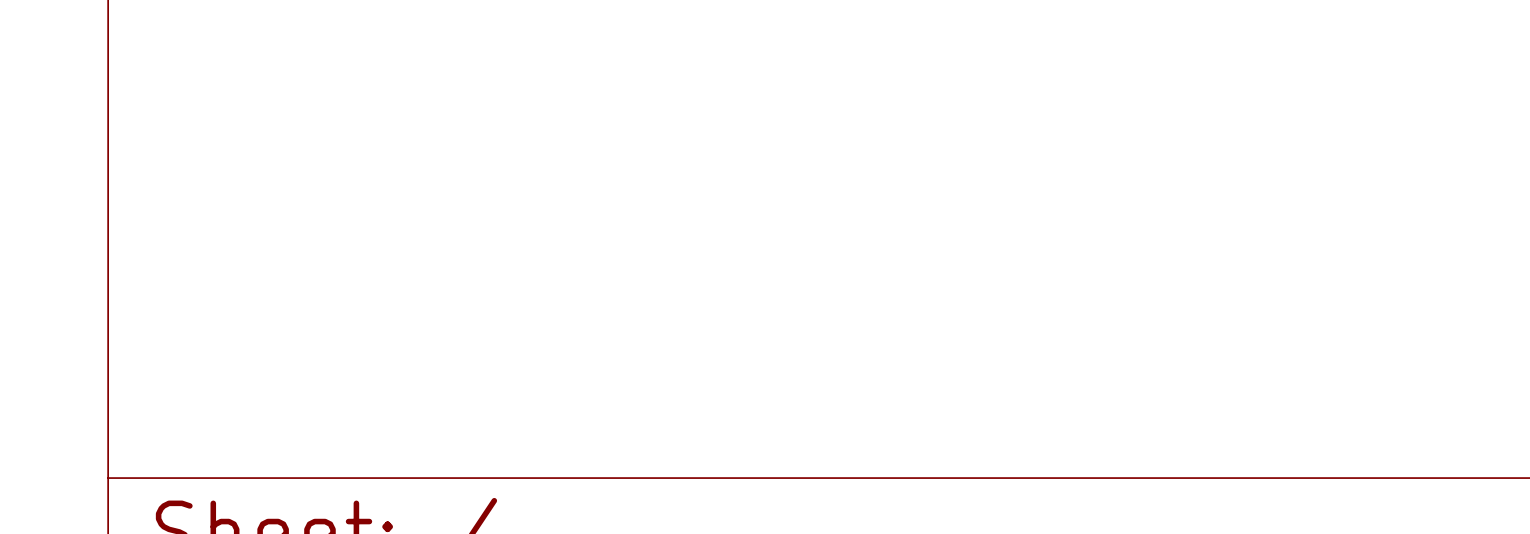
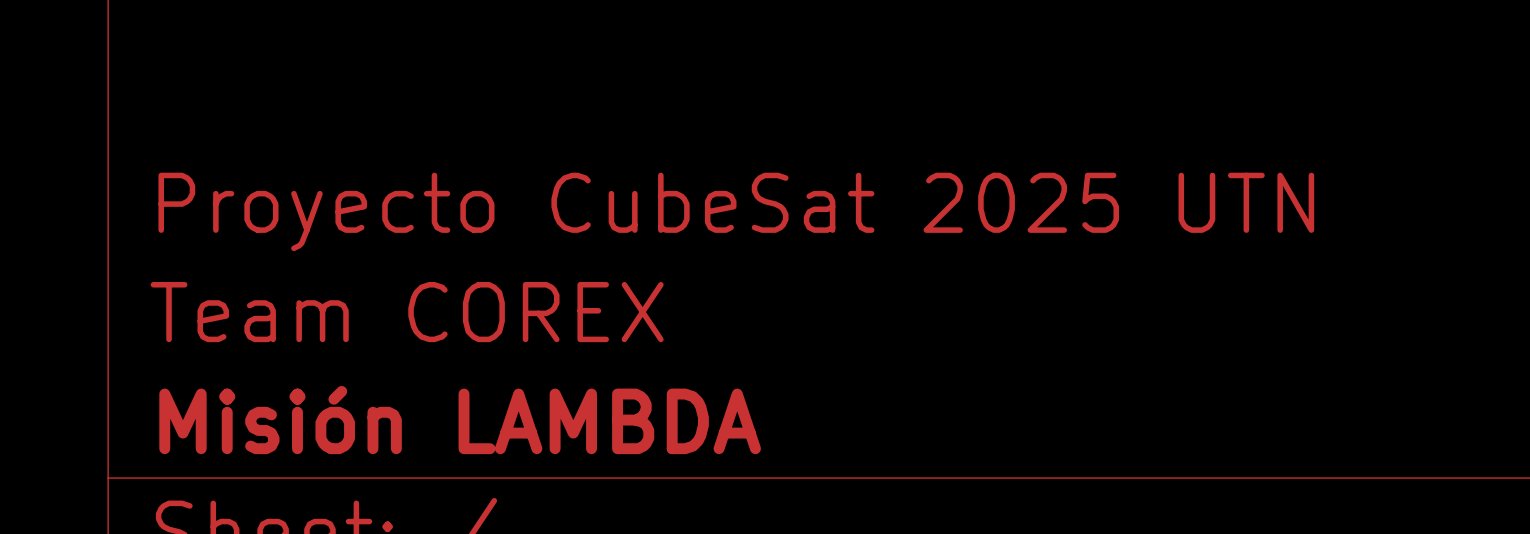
title block: none -> Proyecto CubeSat 2025 UTN (736, 211)
title block: none -> Team COREX (407, 312)
title block: none -> Misión LAMBDA (460, 420)

